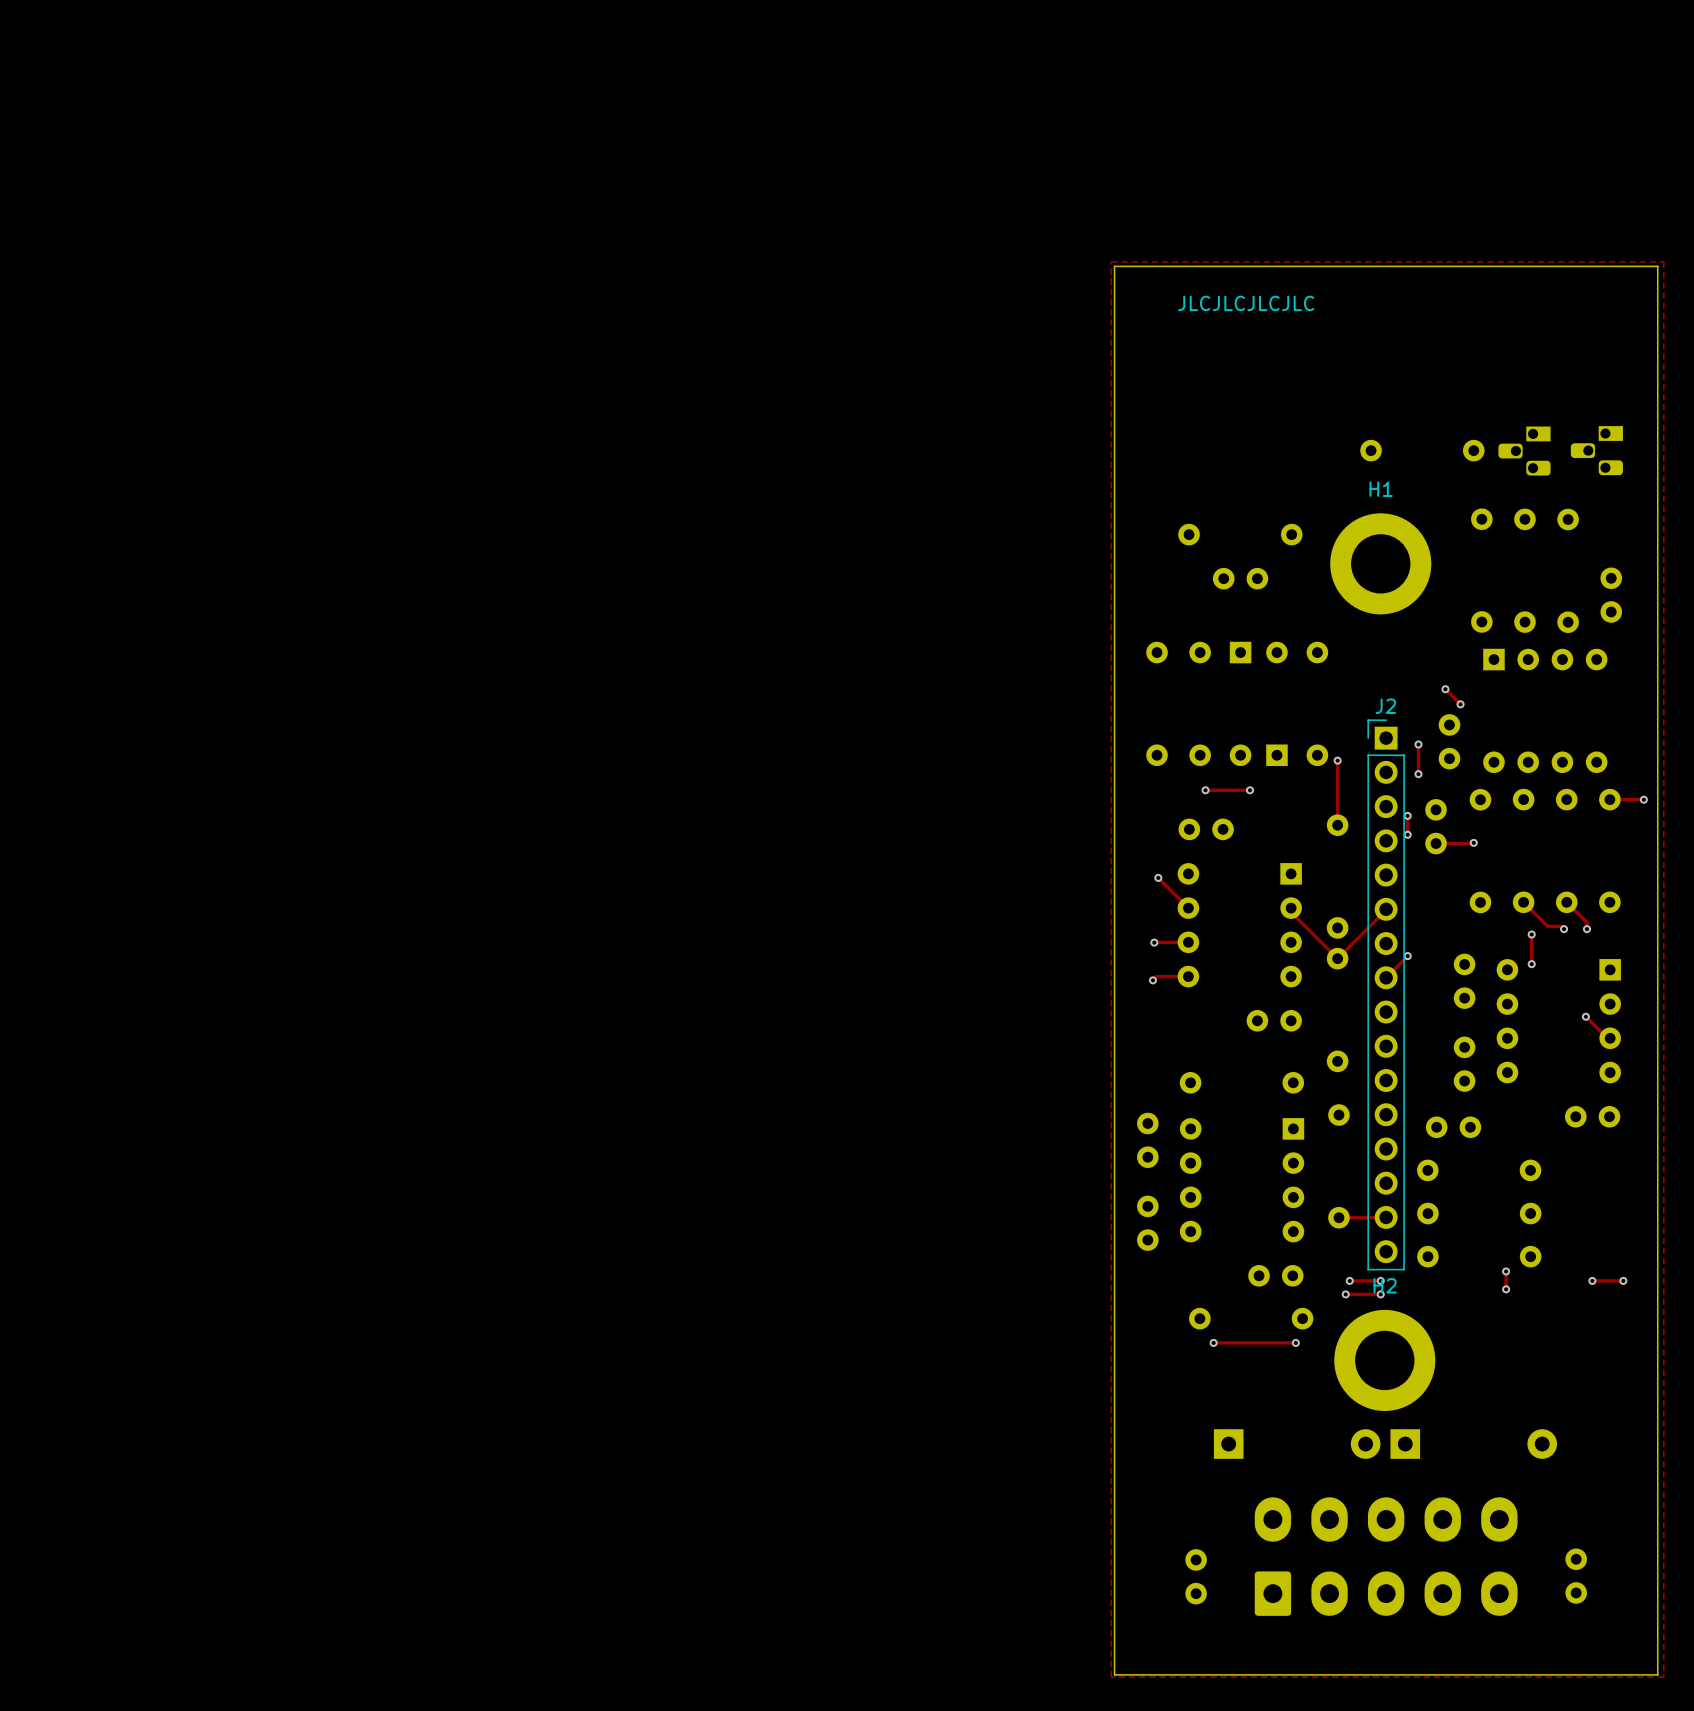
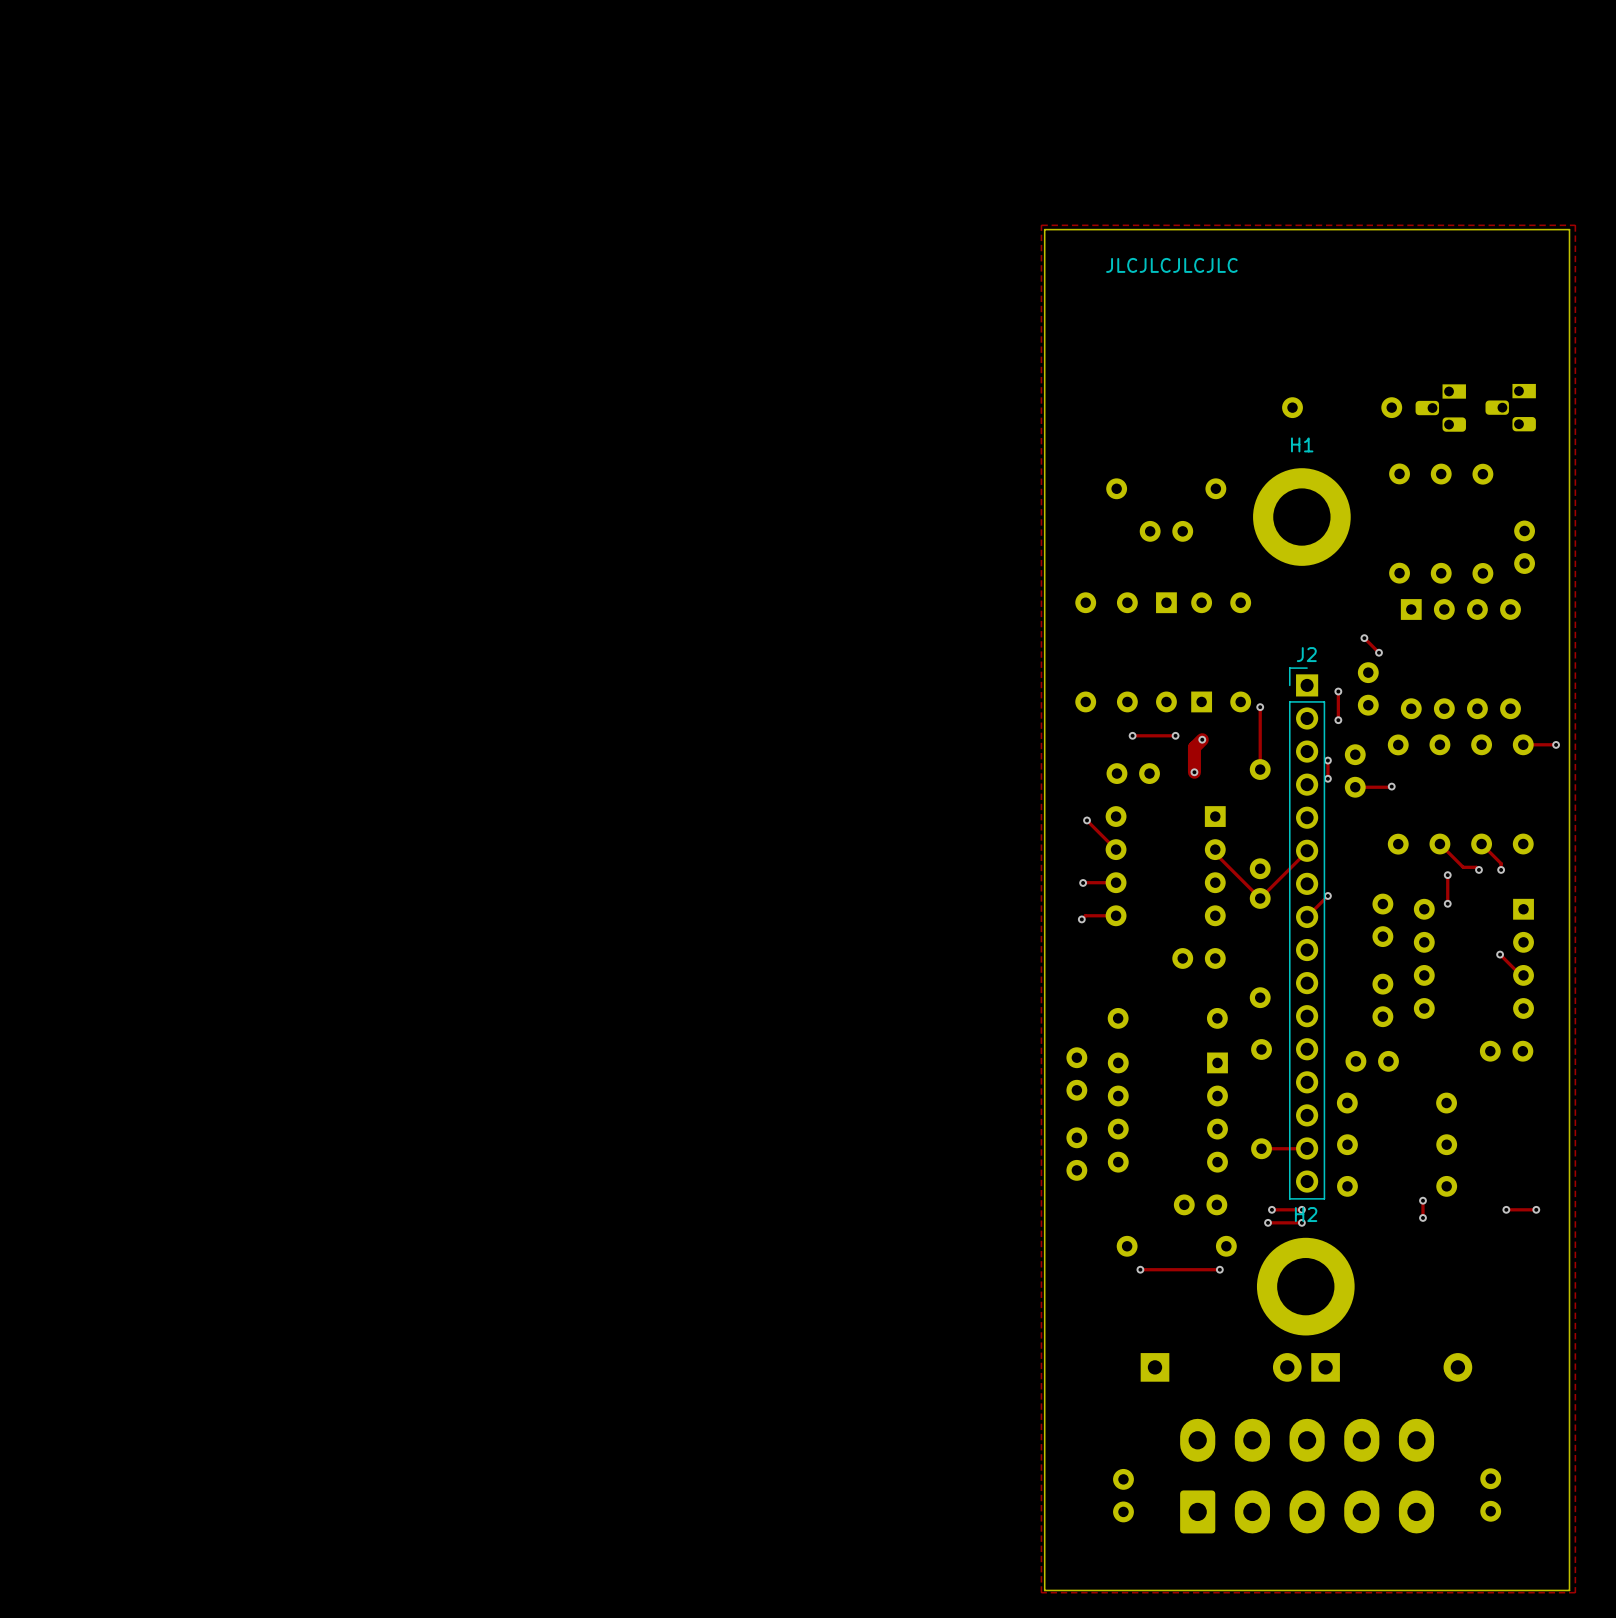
track: none -> (1202, 739) (1194, 747) (1194, 772)
via: none -> (1202, 739)
via: none -> (1194, 772)

